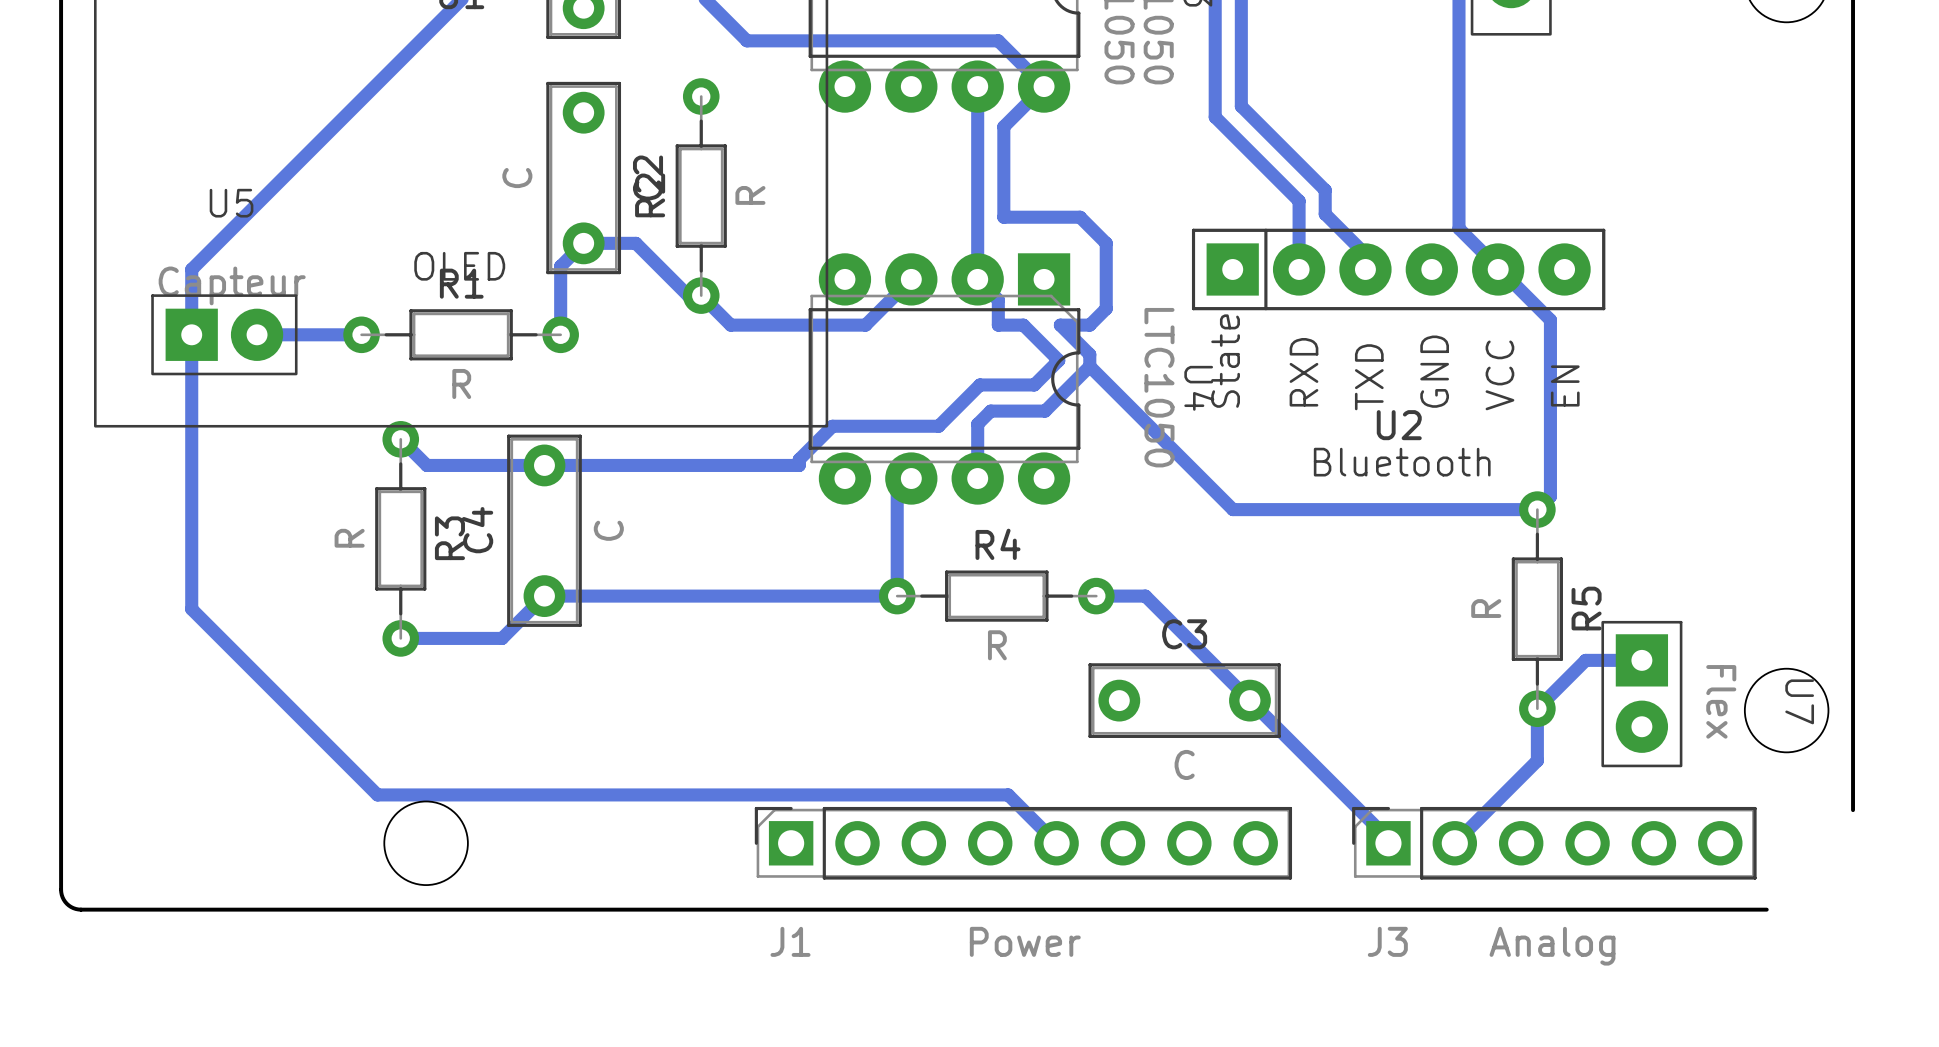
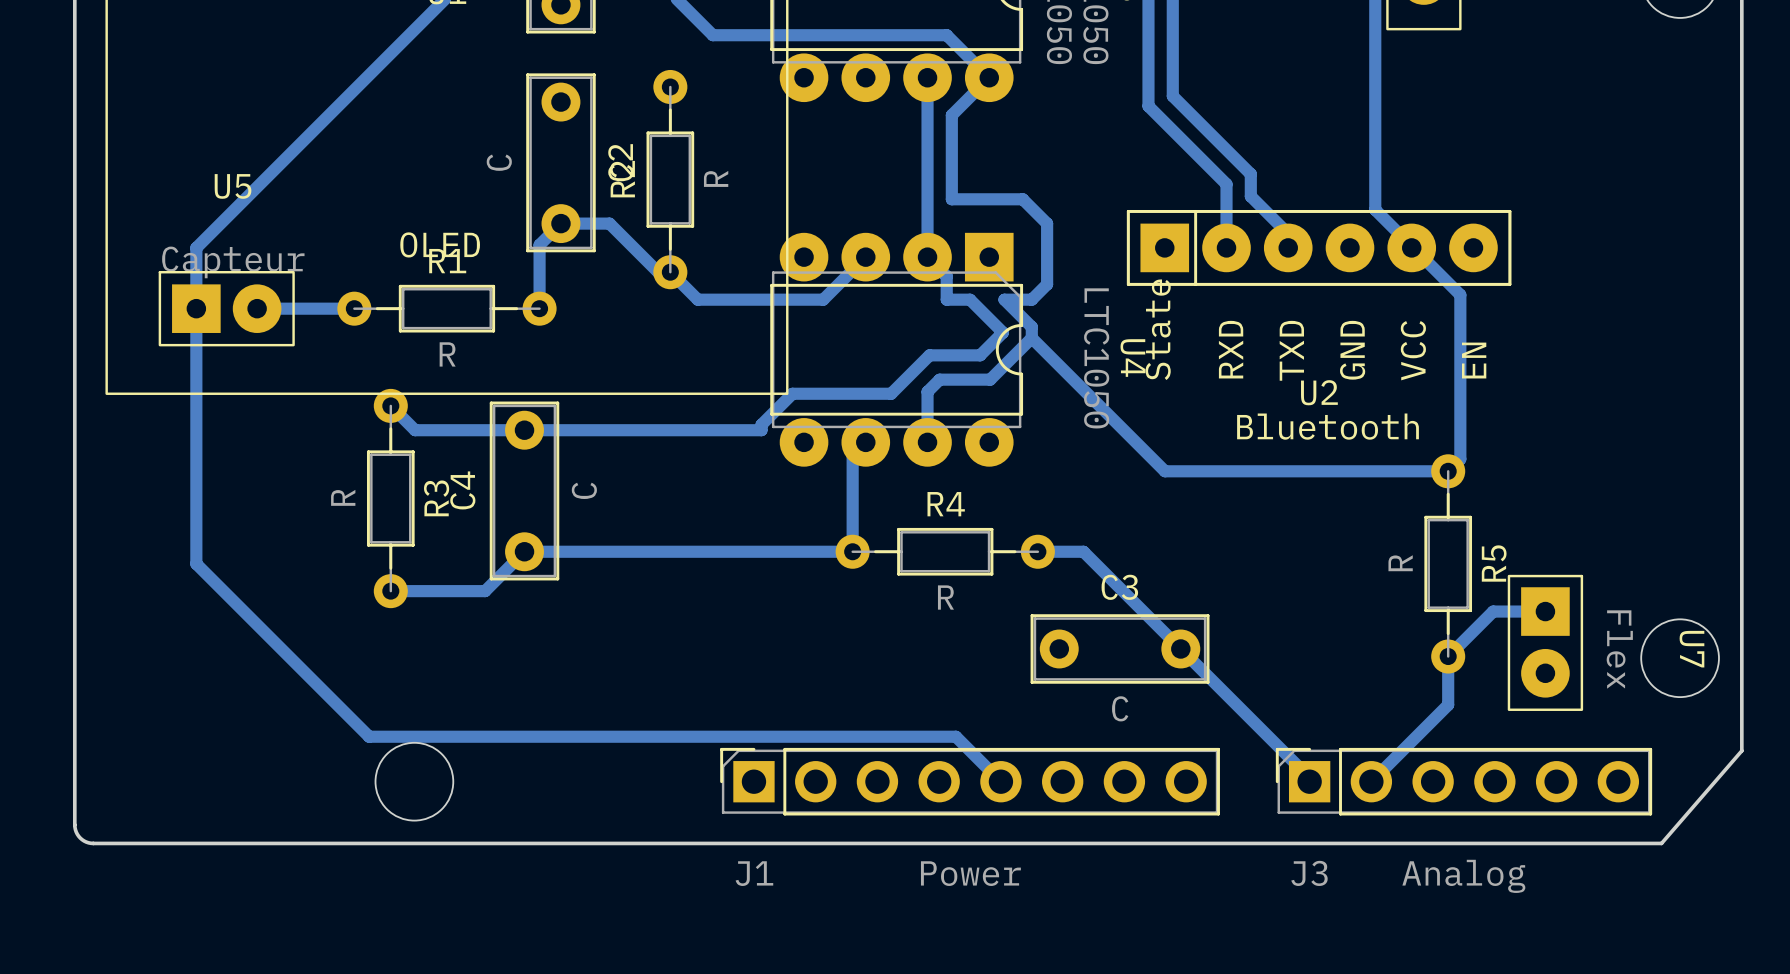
board edge: none -> (1741, 750) (1661, 843)

